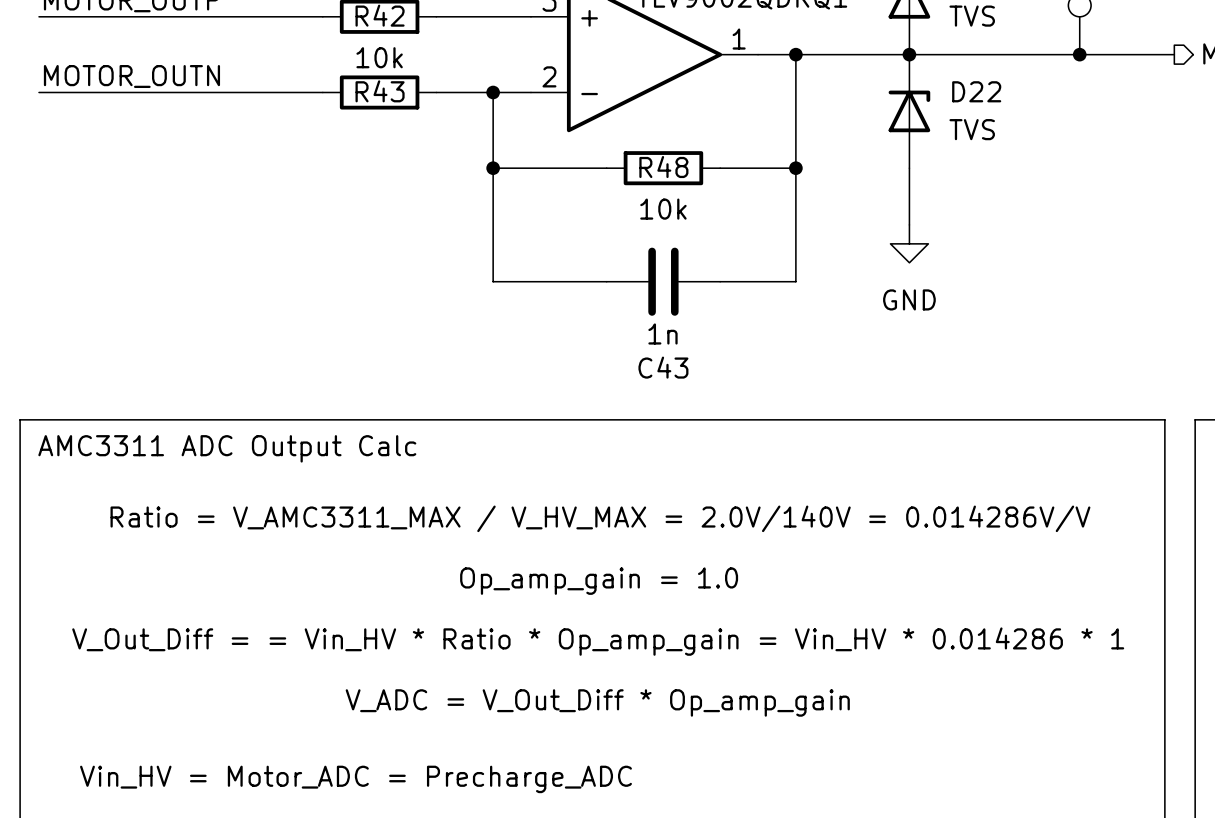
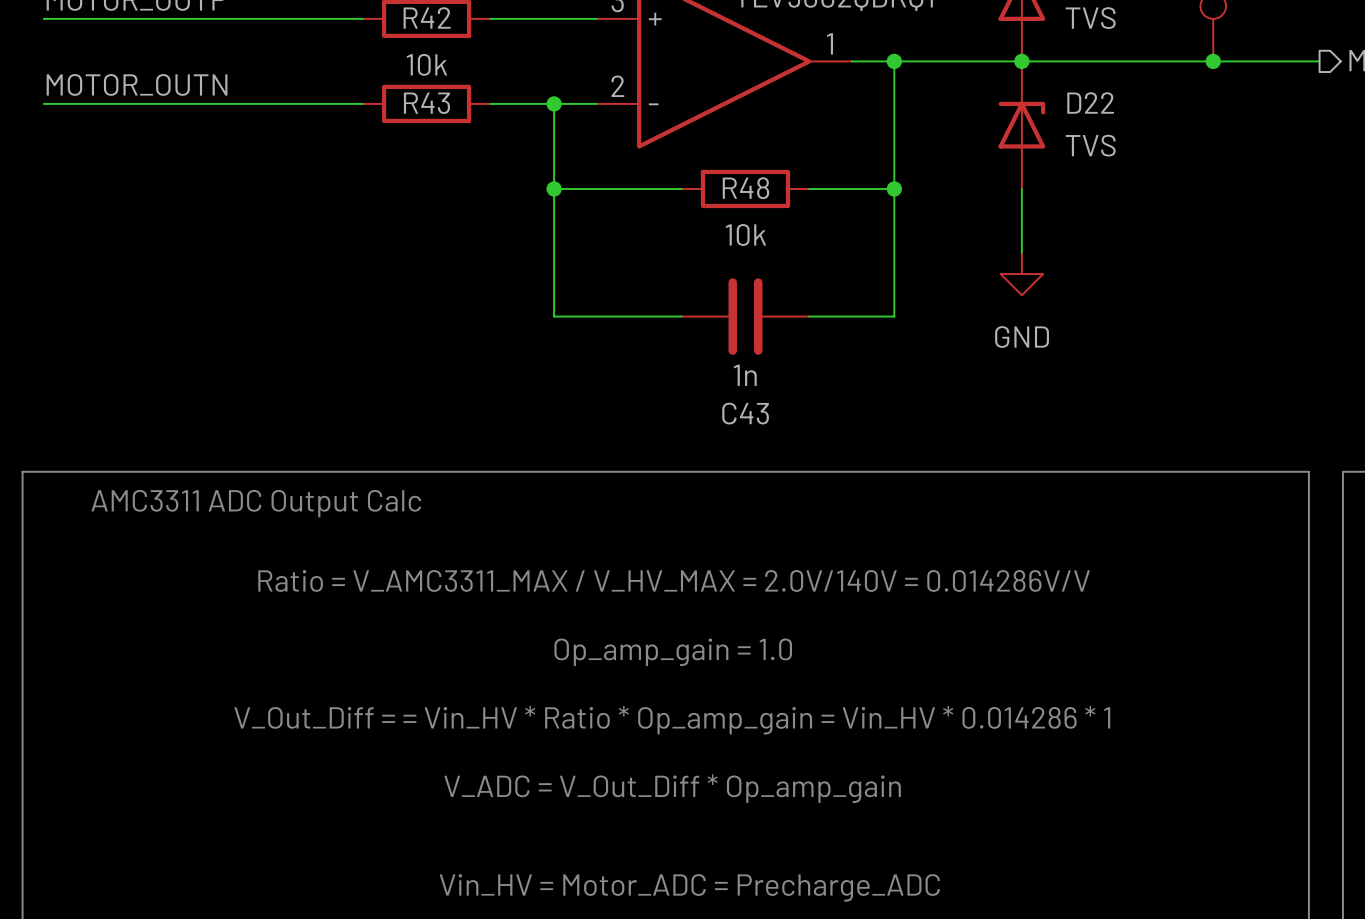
text position: Vin_HV = Motor_ADC = Precharge_ADC (356, 779) -> Vin_HV = Motor_ADC = Precharge_ADC (689, 887)

